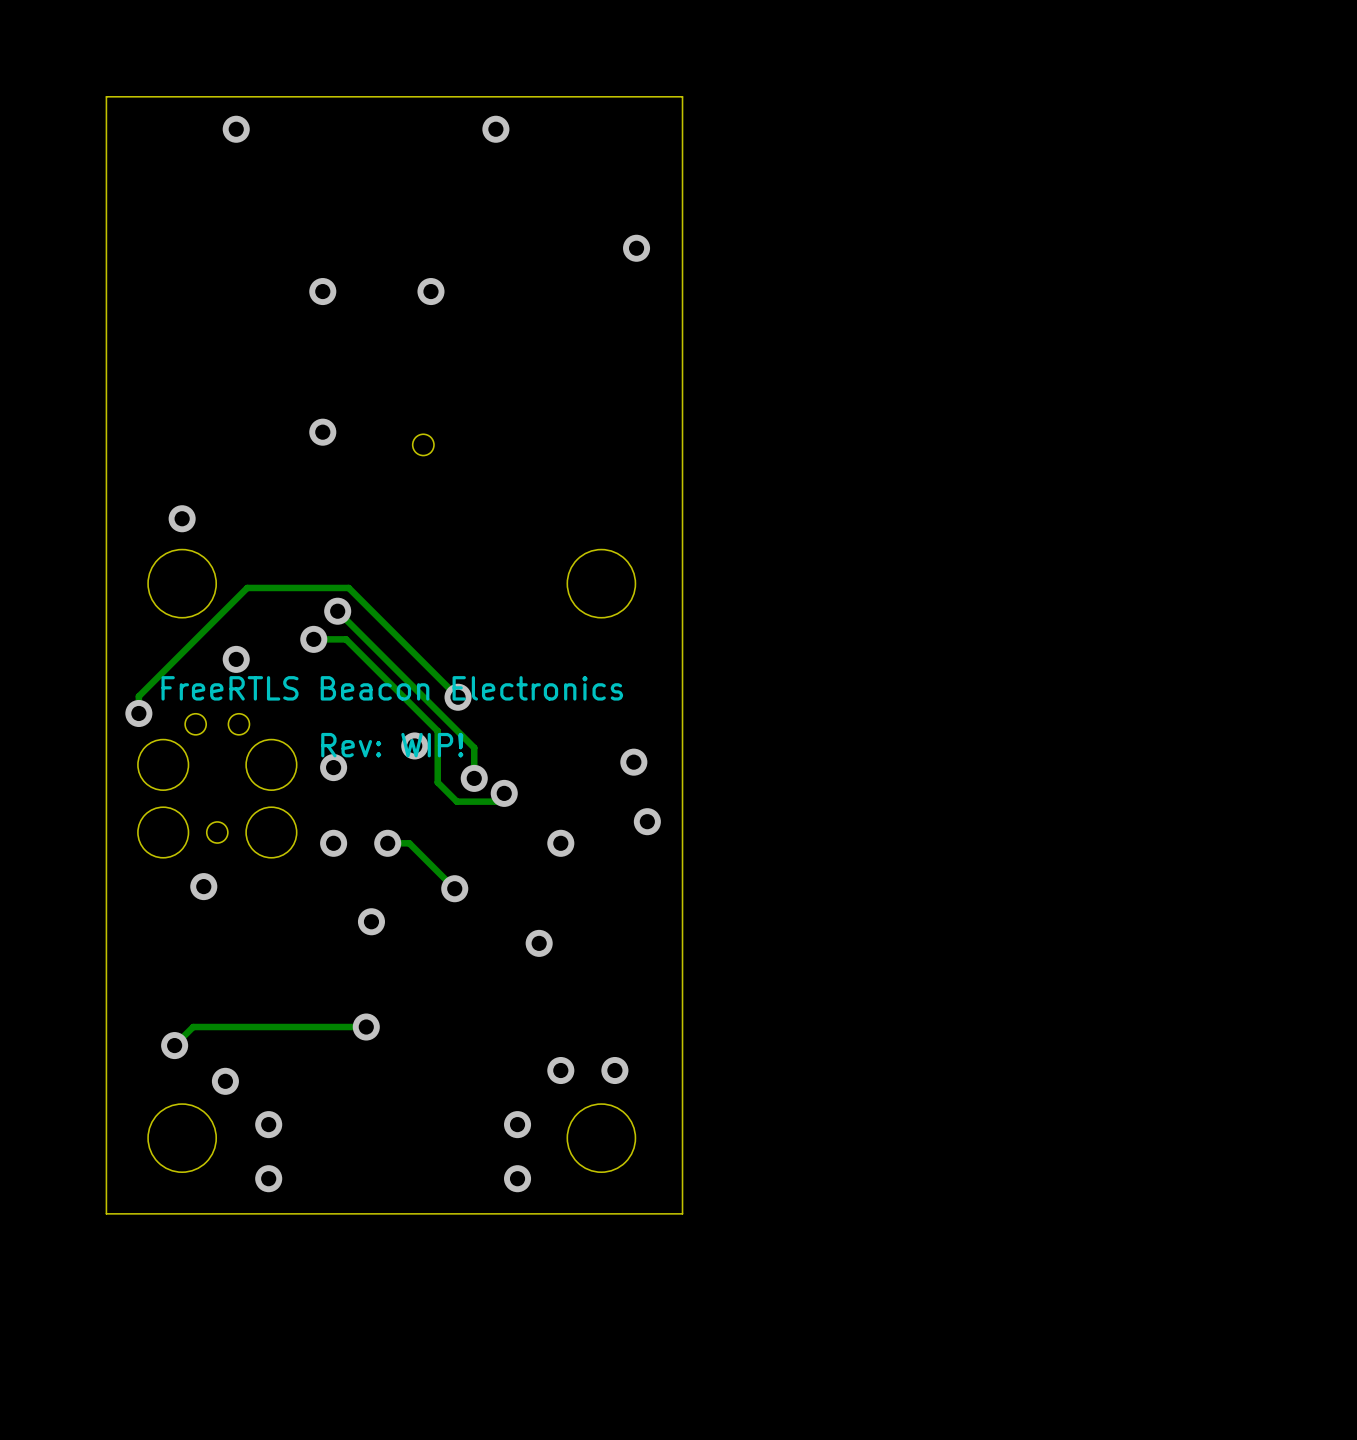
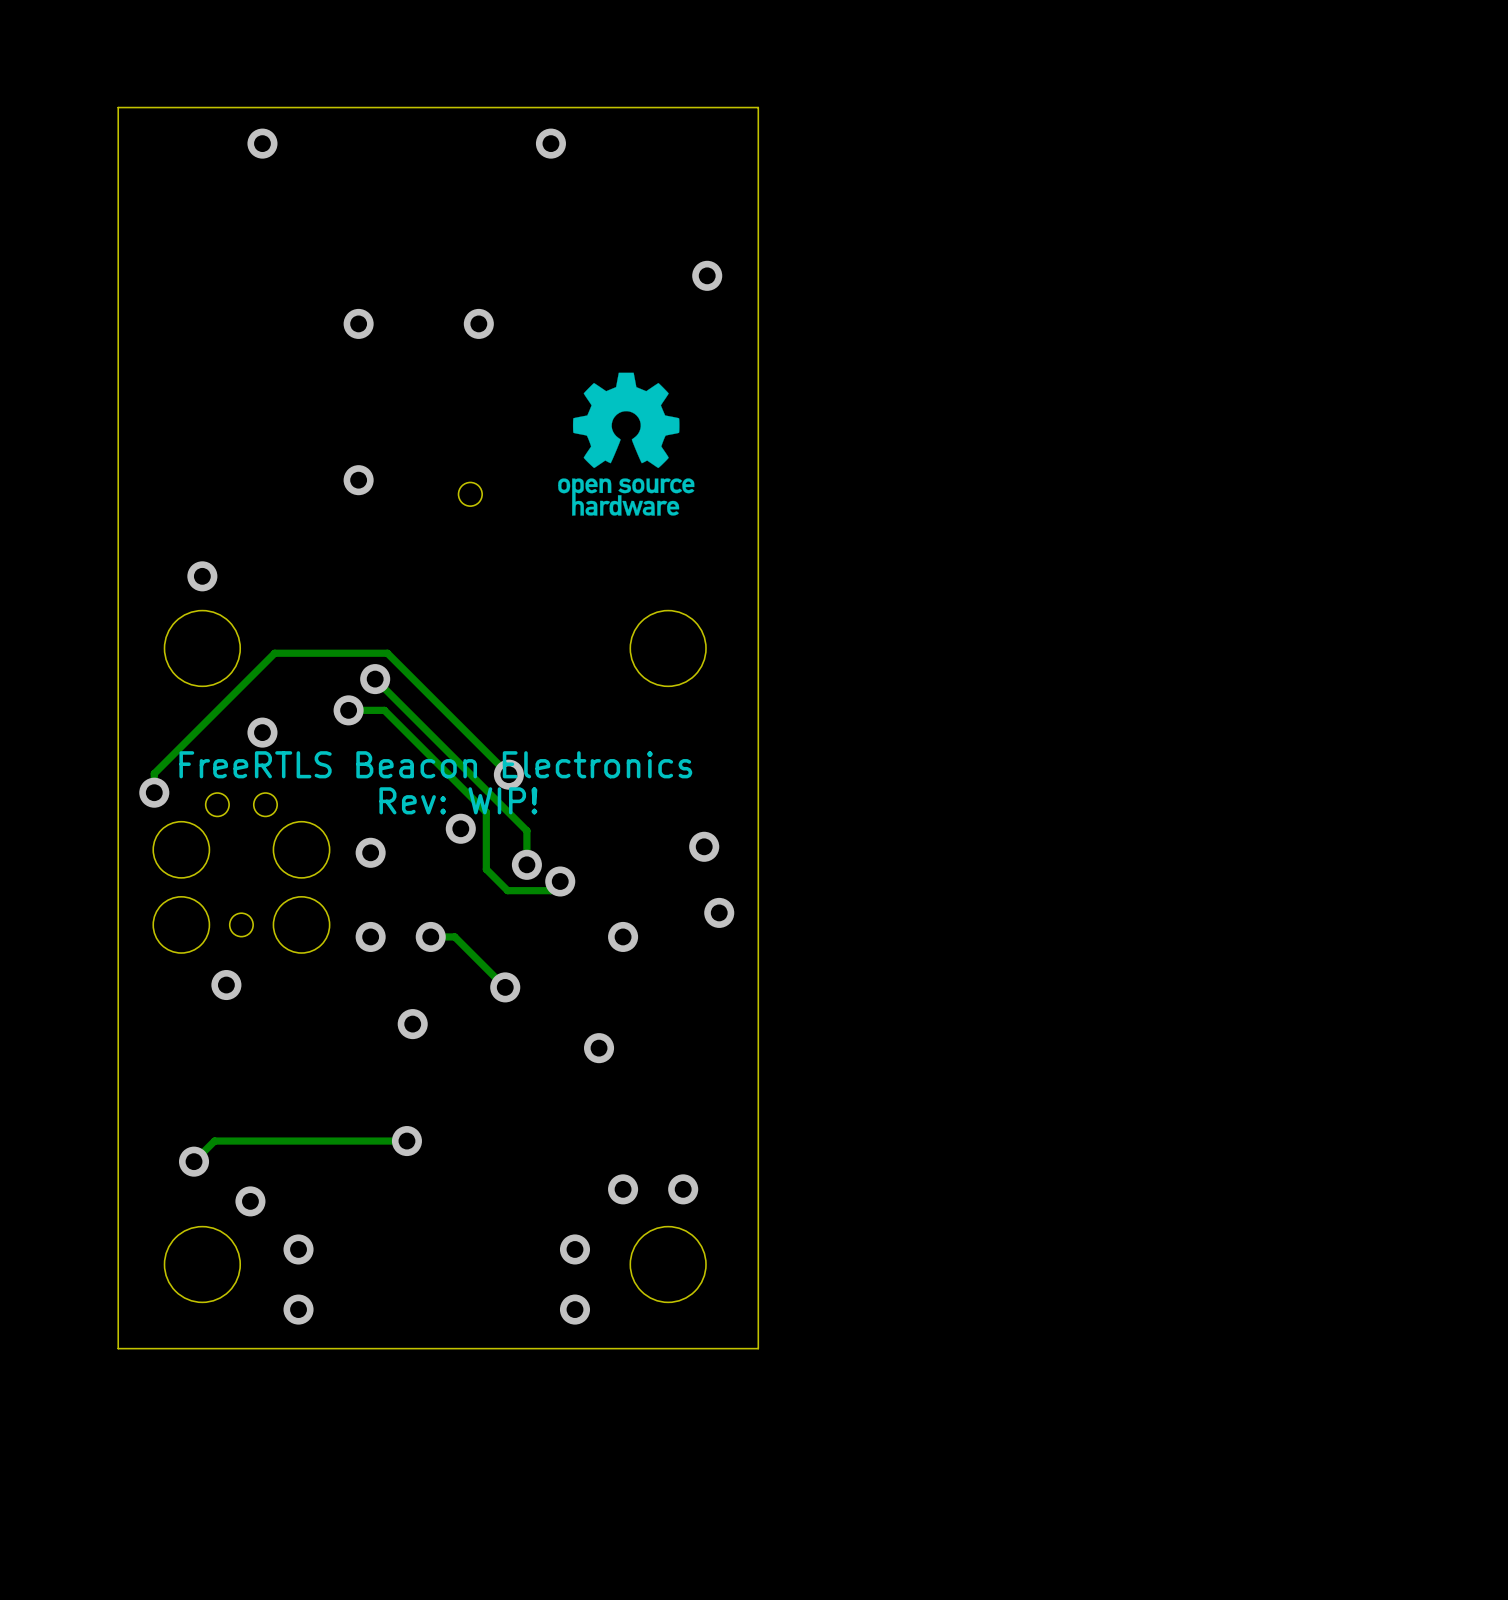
drawing: none -> [558, 372, 695, 516]
text position: Rev: WIP! (392, 745) -> Rev: WIP! (458, 800)

